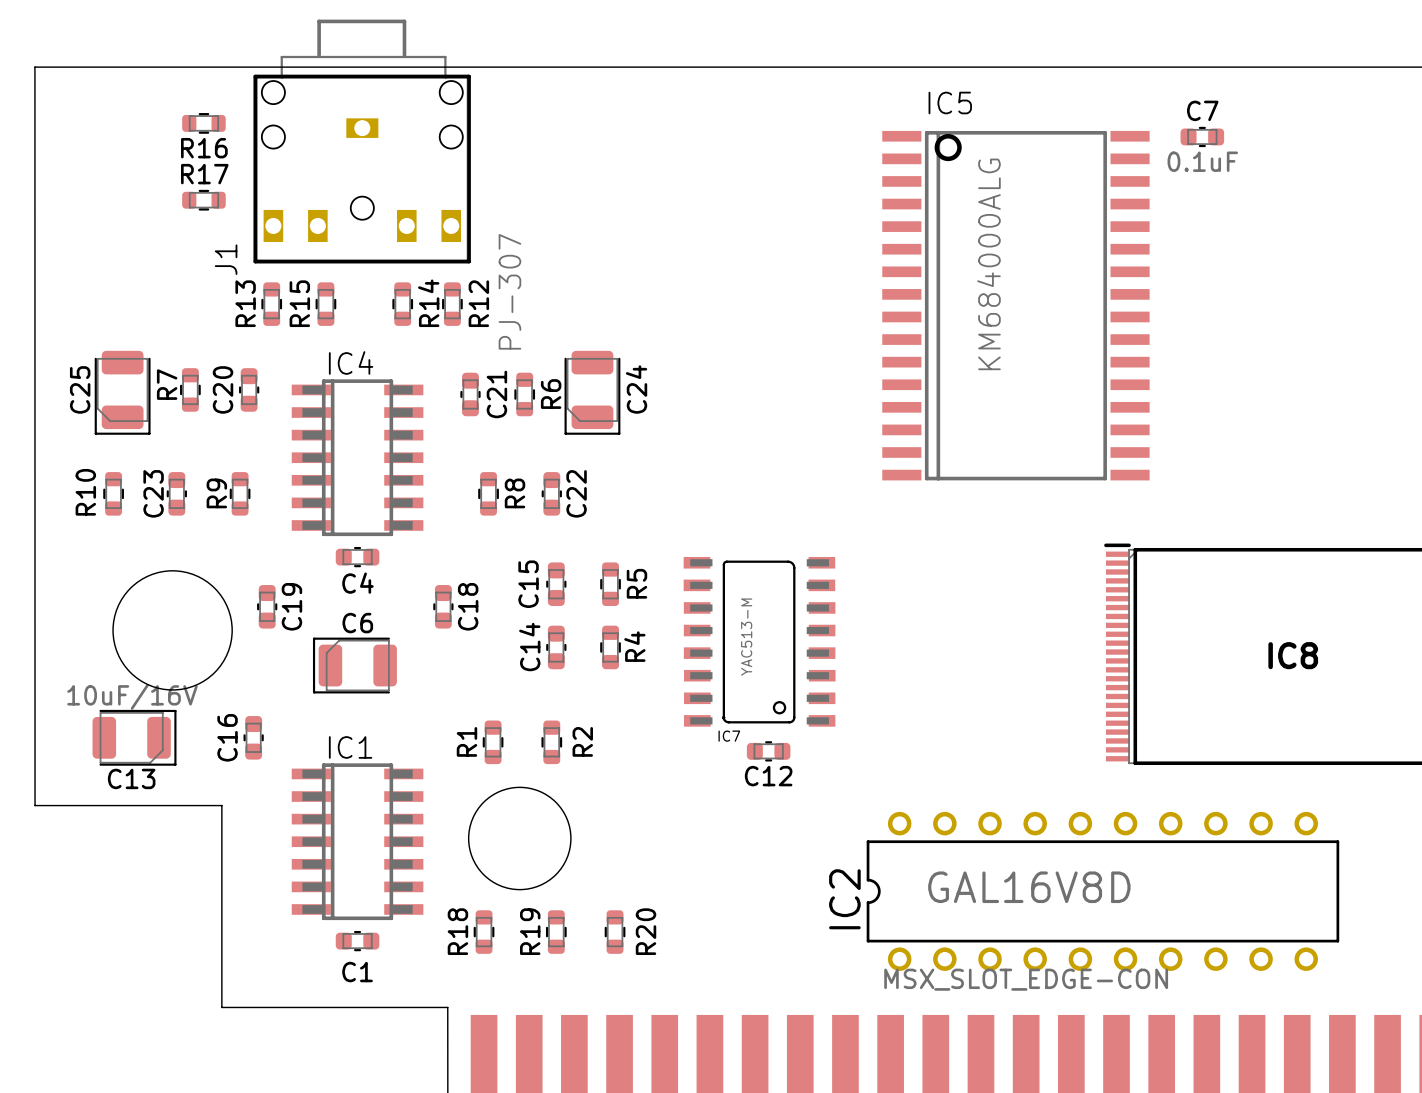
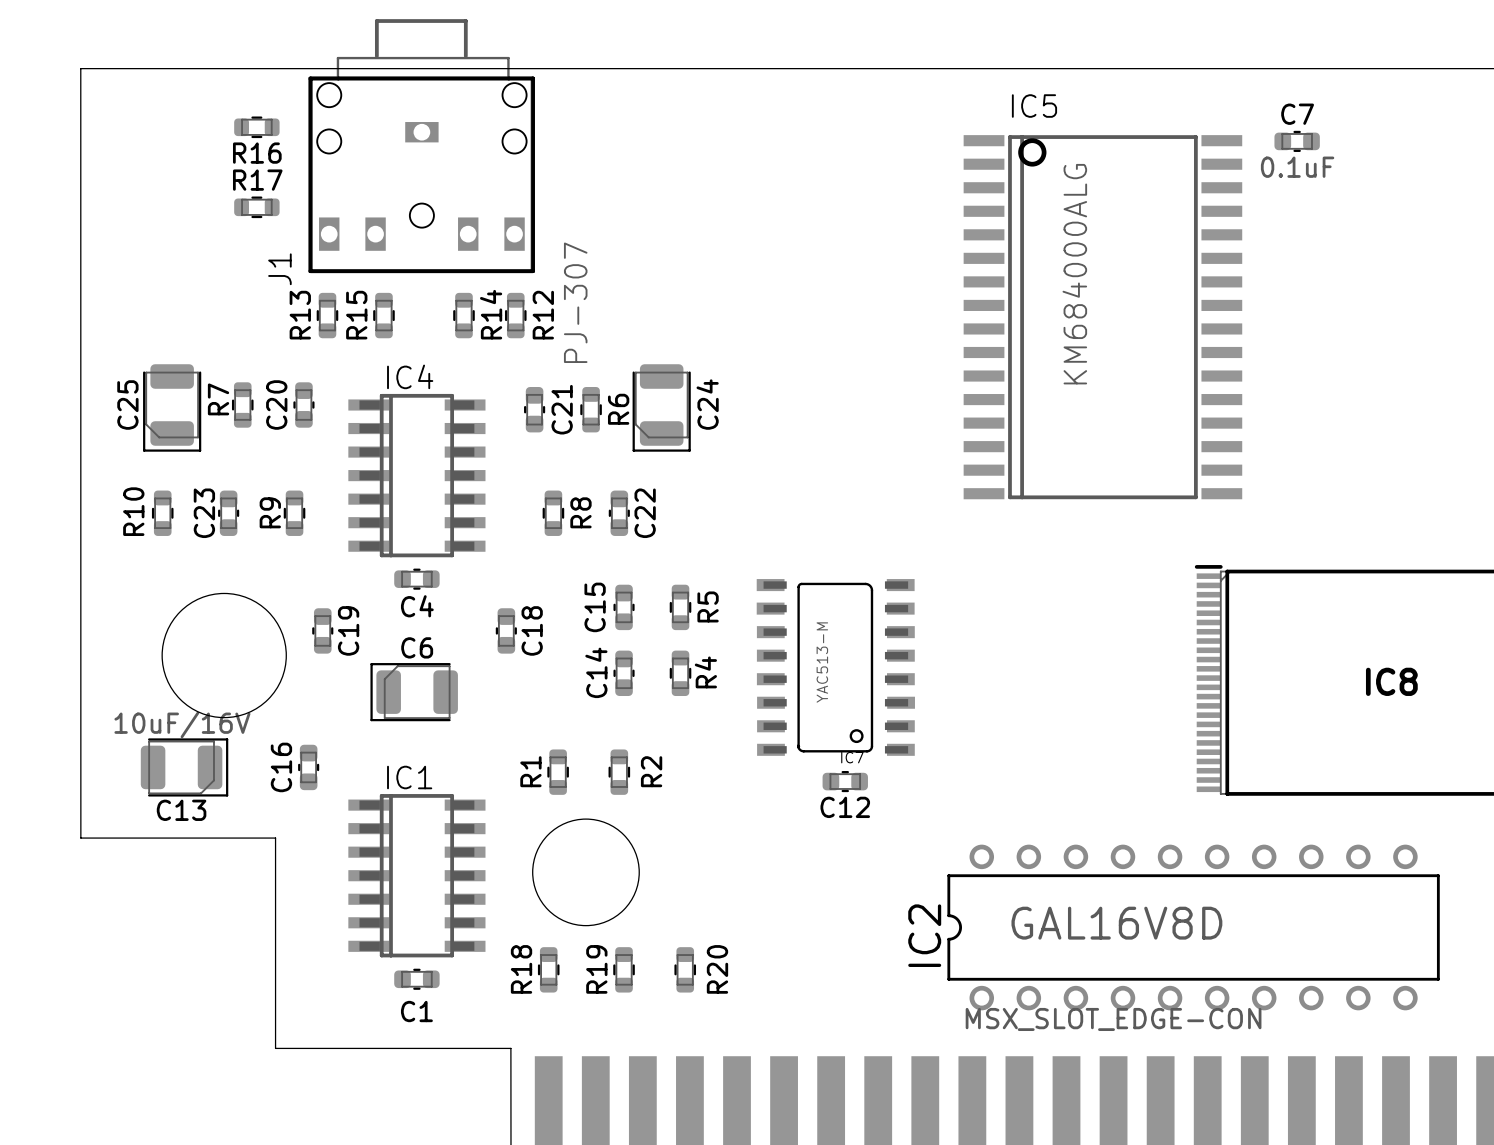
IC7 name position: IC7 (729, 736) -> IC7 (852, 757)

